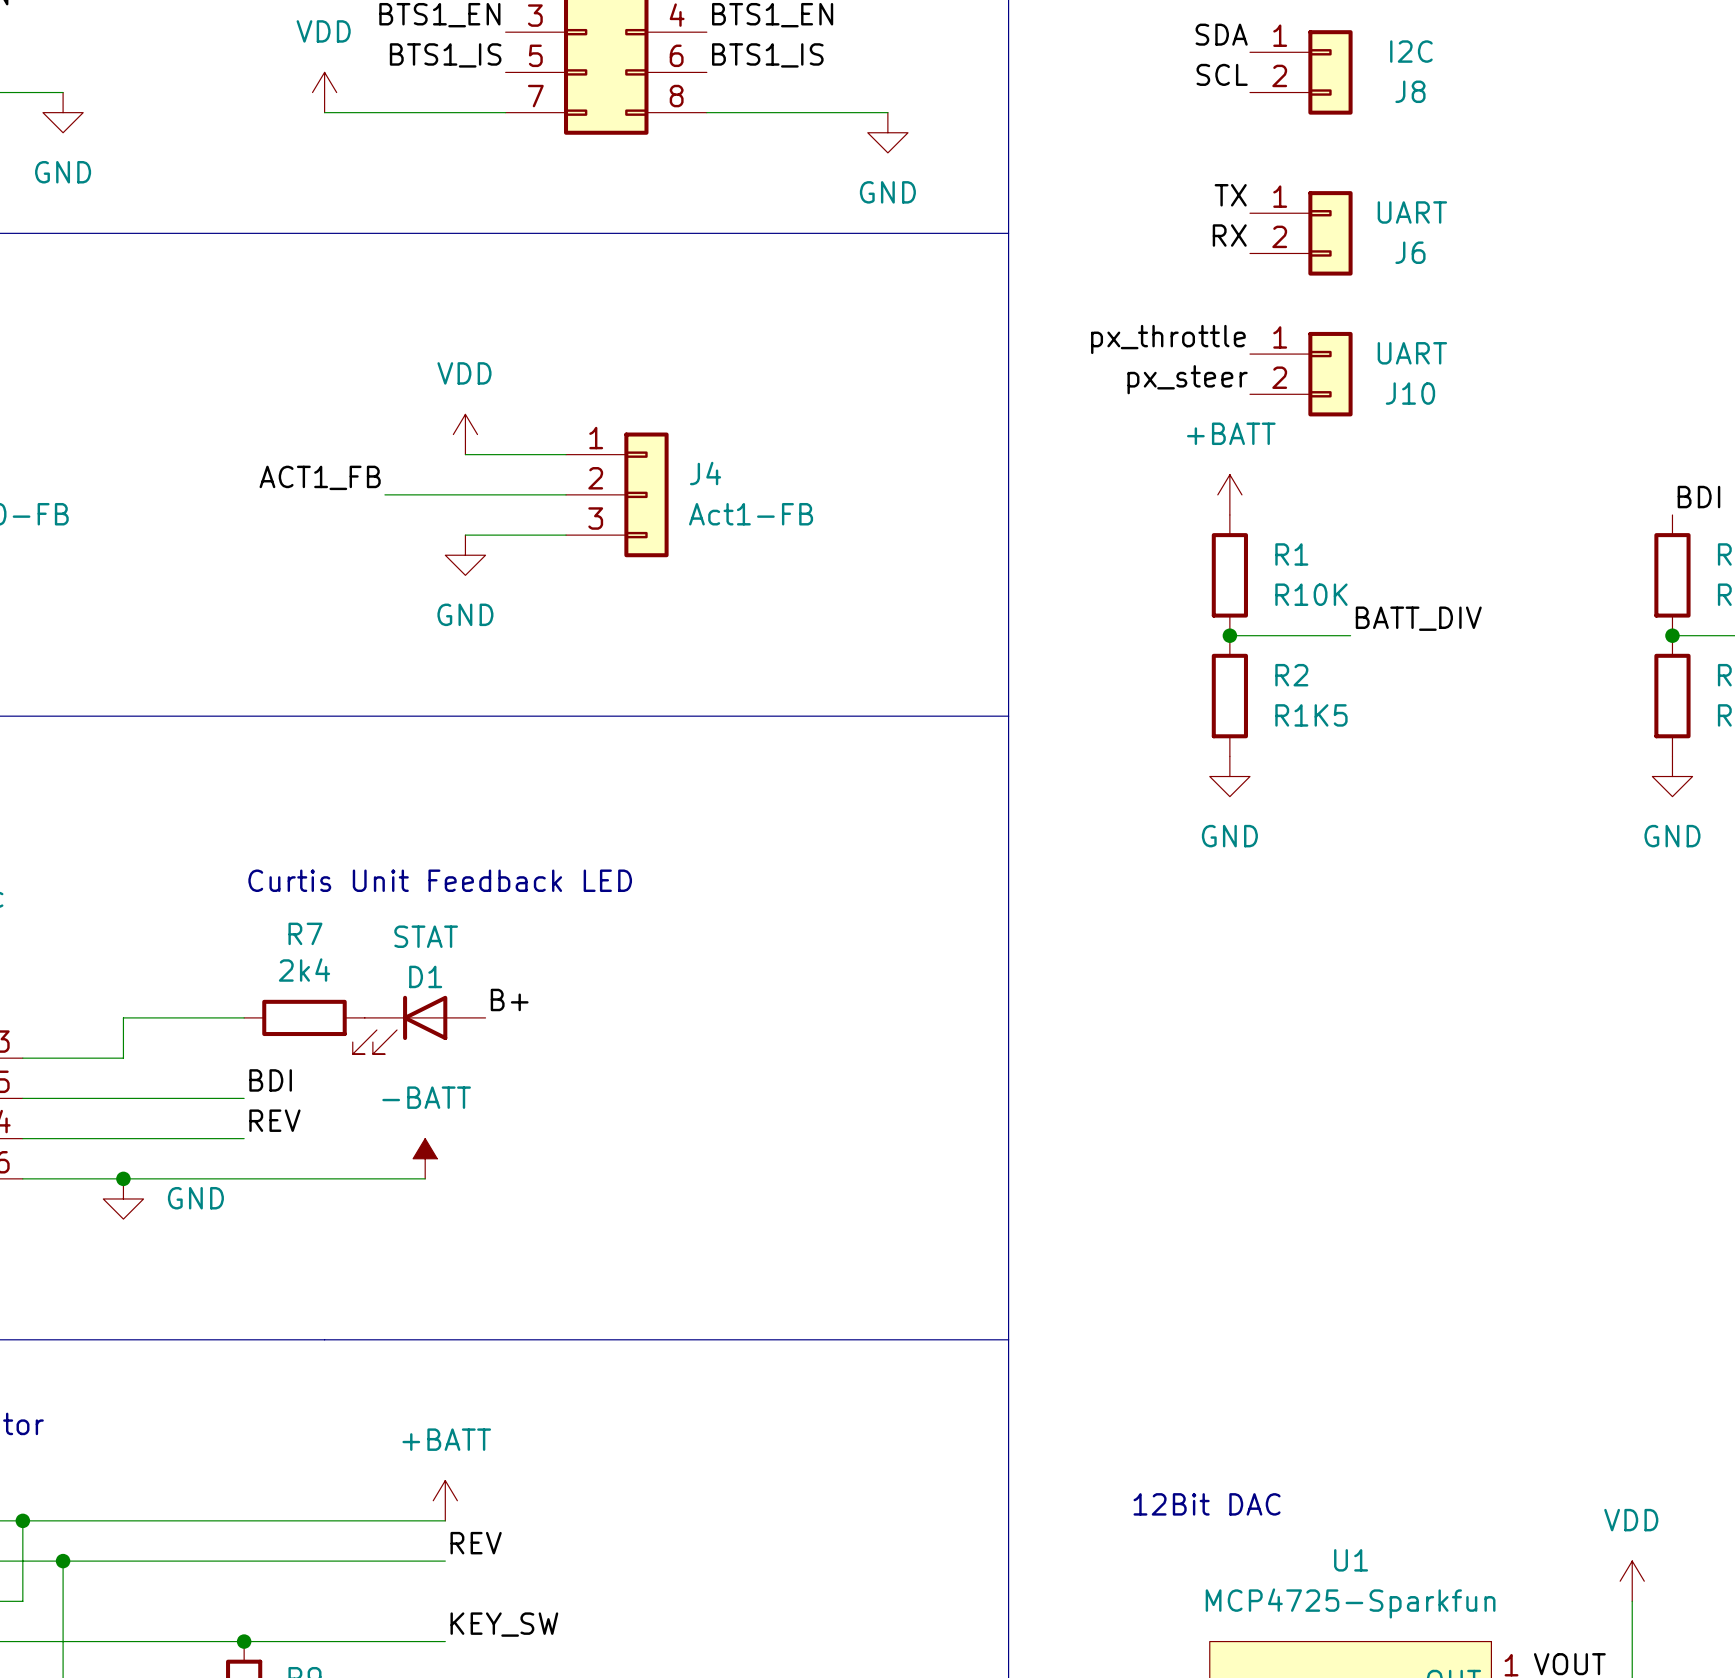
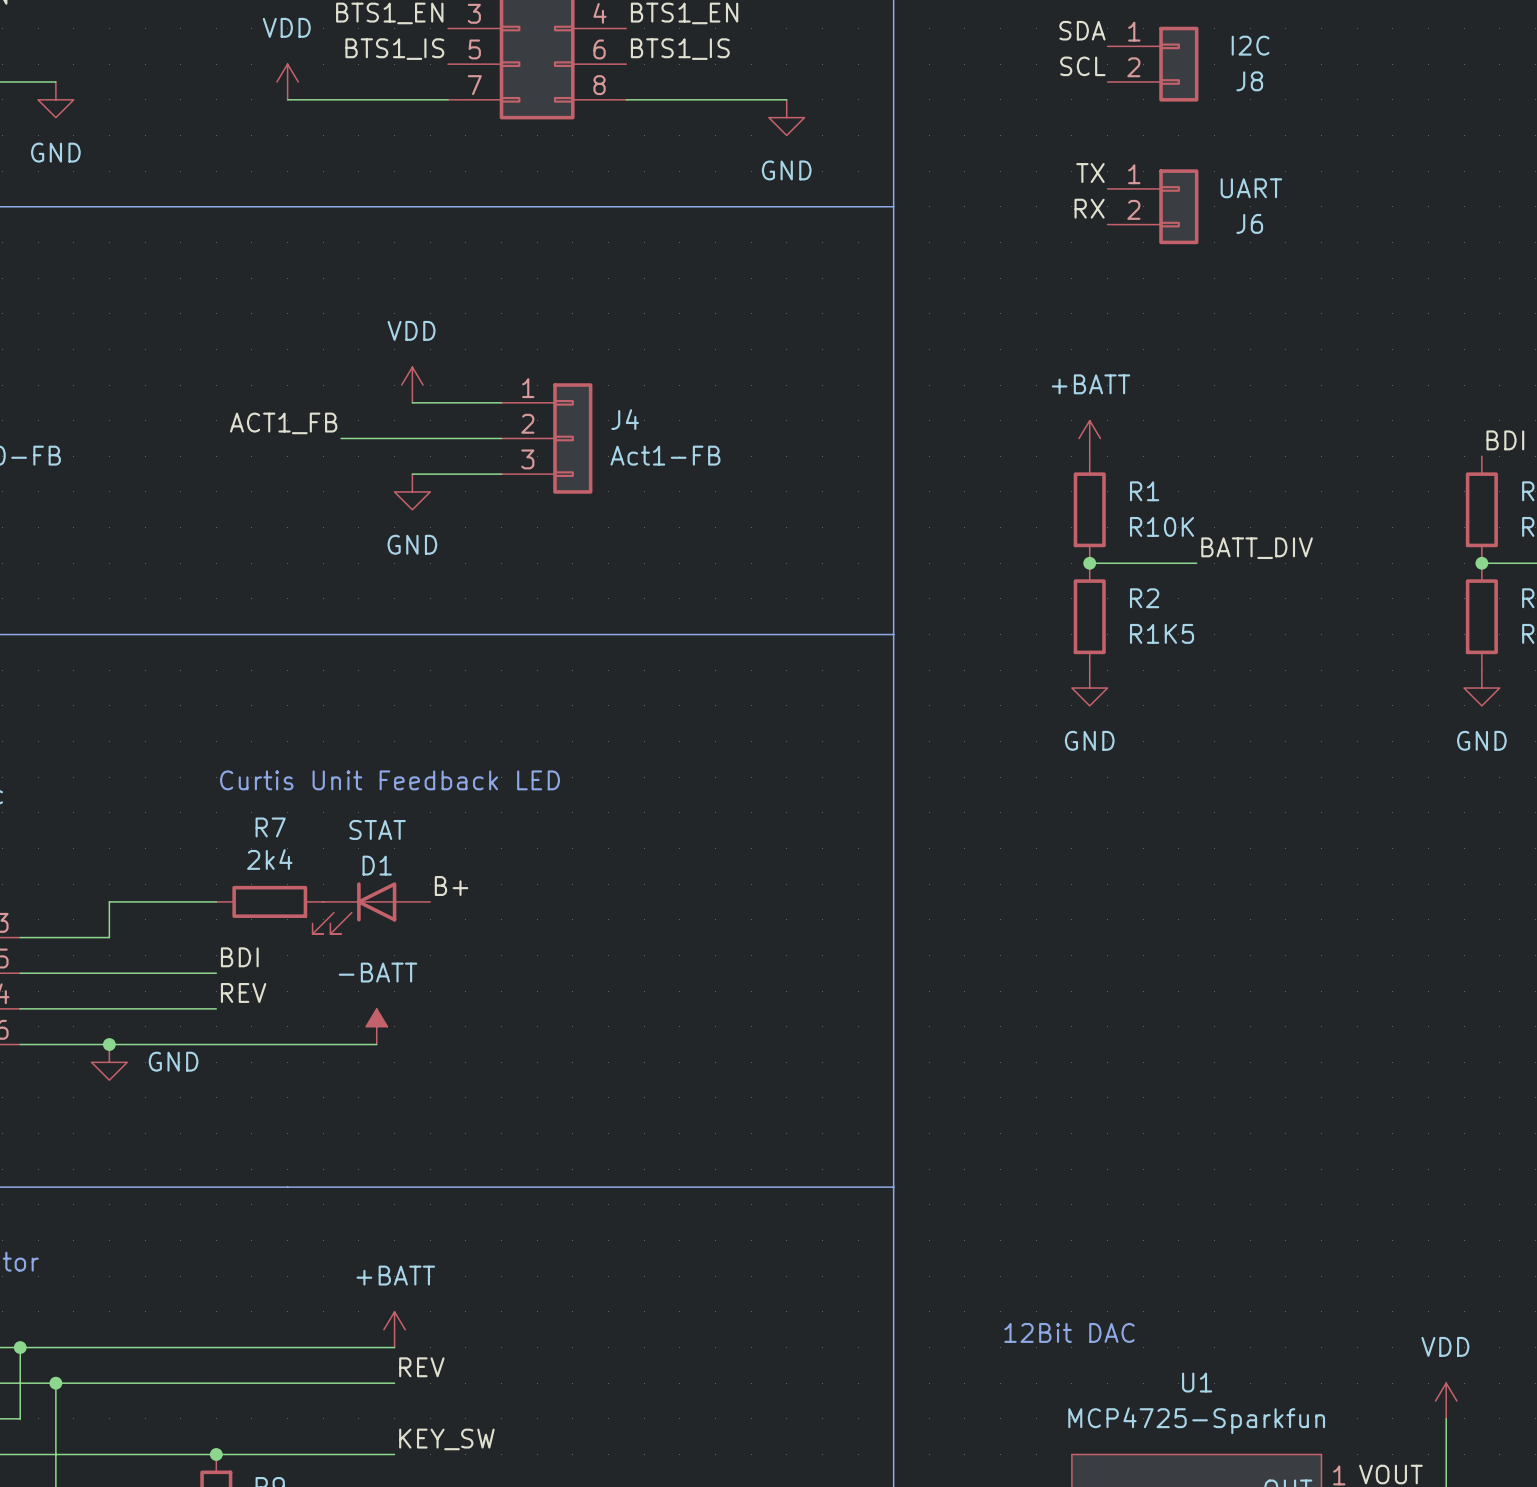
label: px_throttle (1168, 339) -> none
J10: UART (1301, 374) -> none
label: px_steer (1187, 379) -> none

